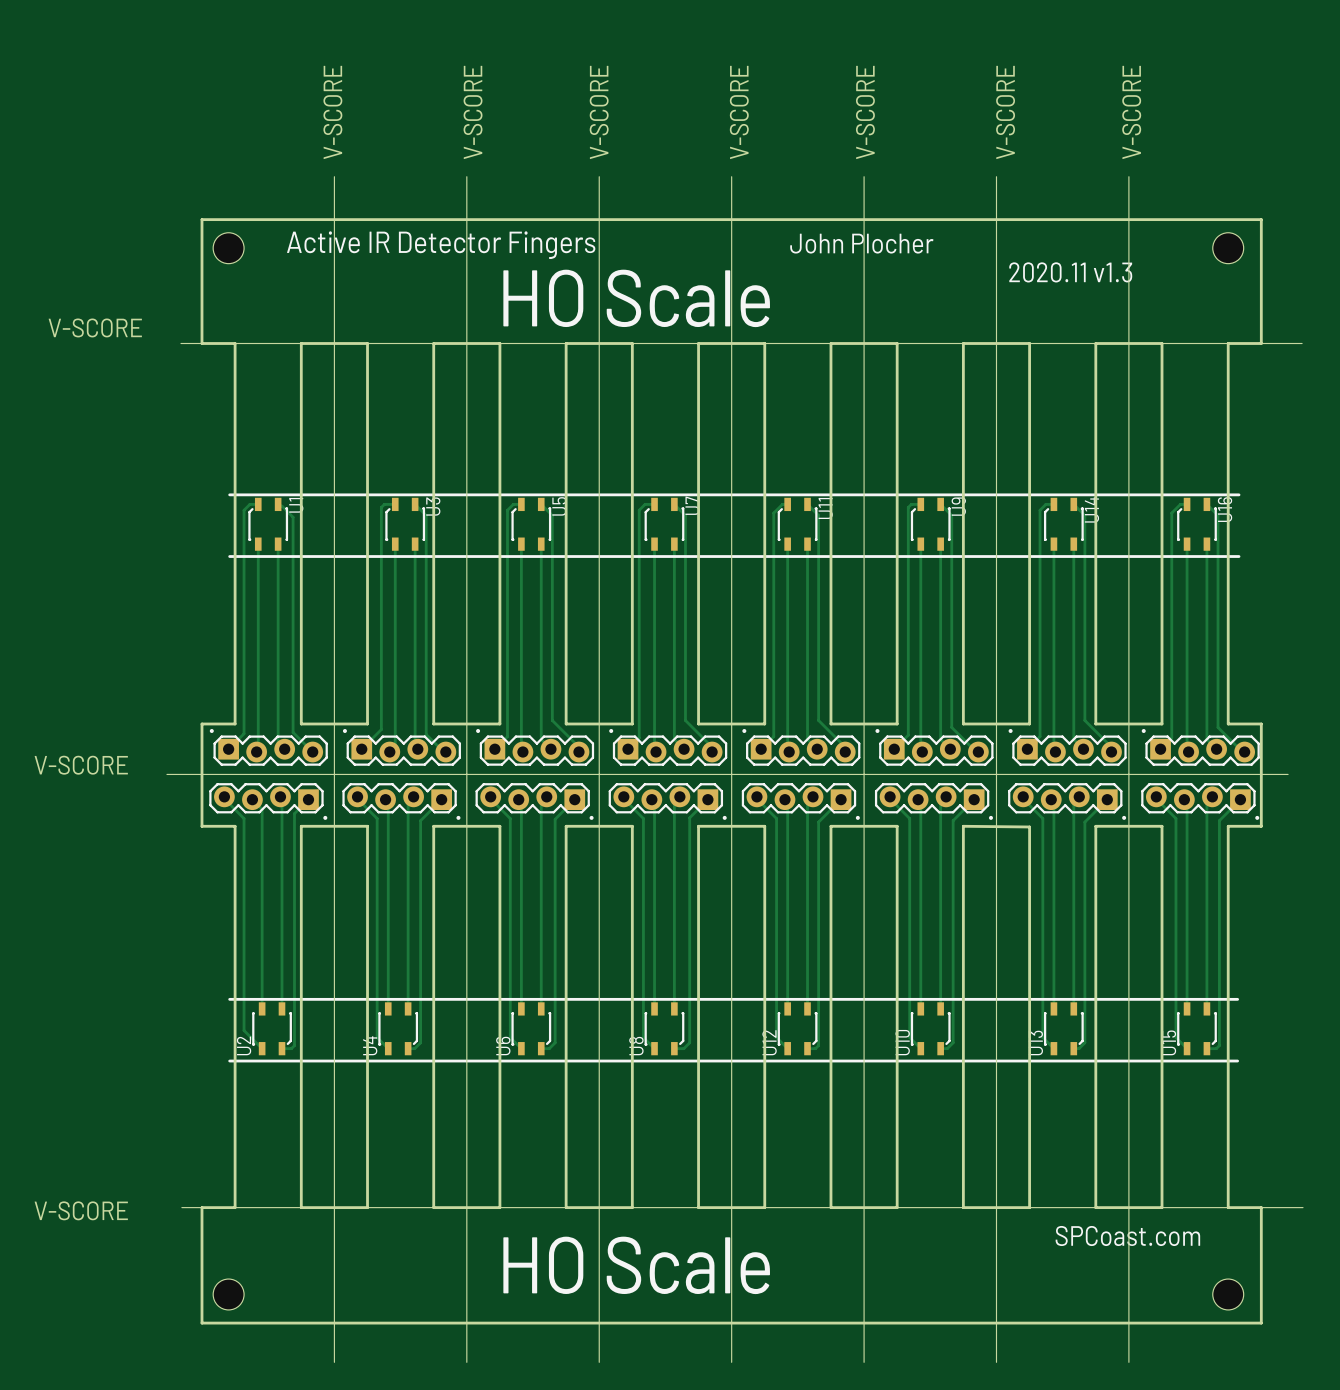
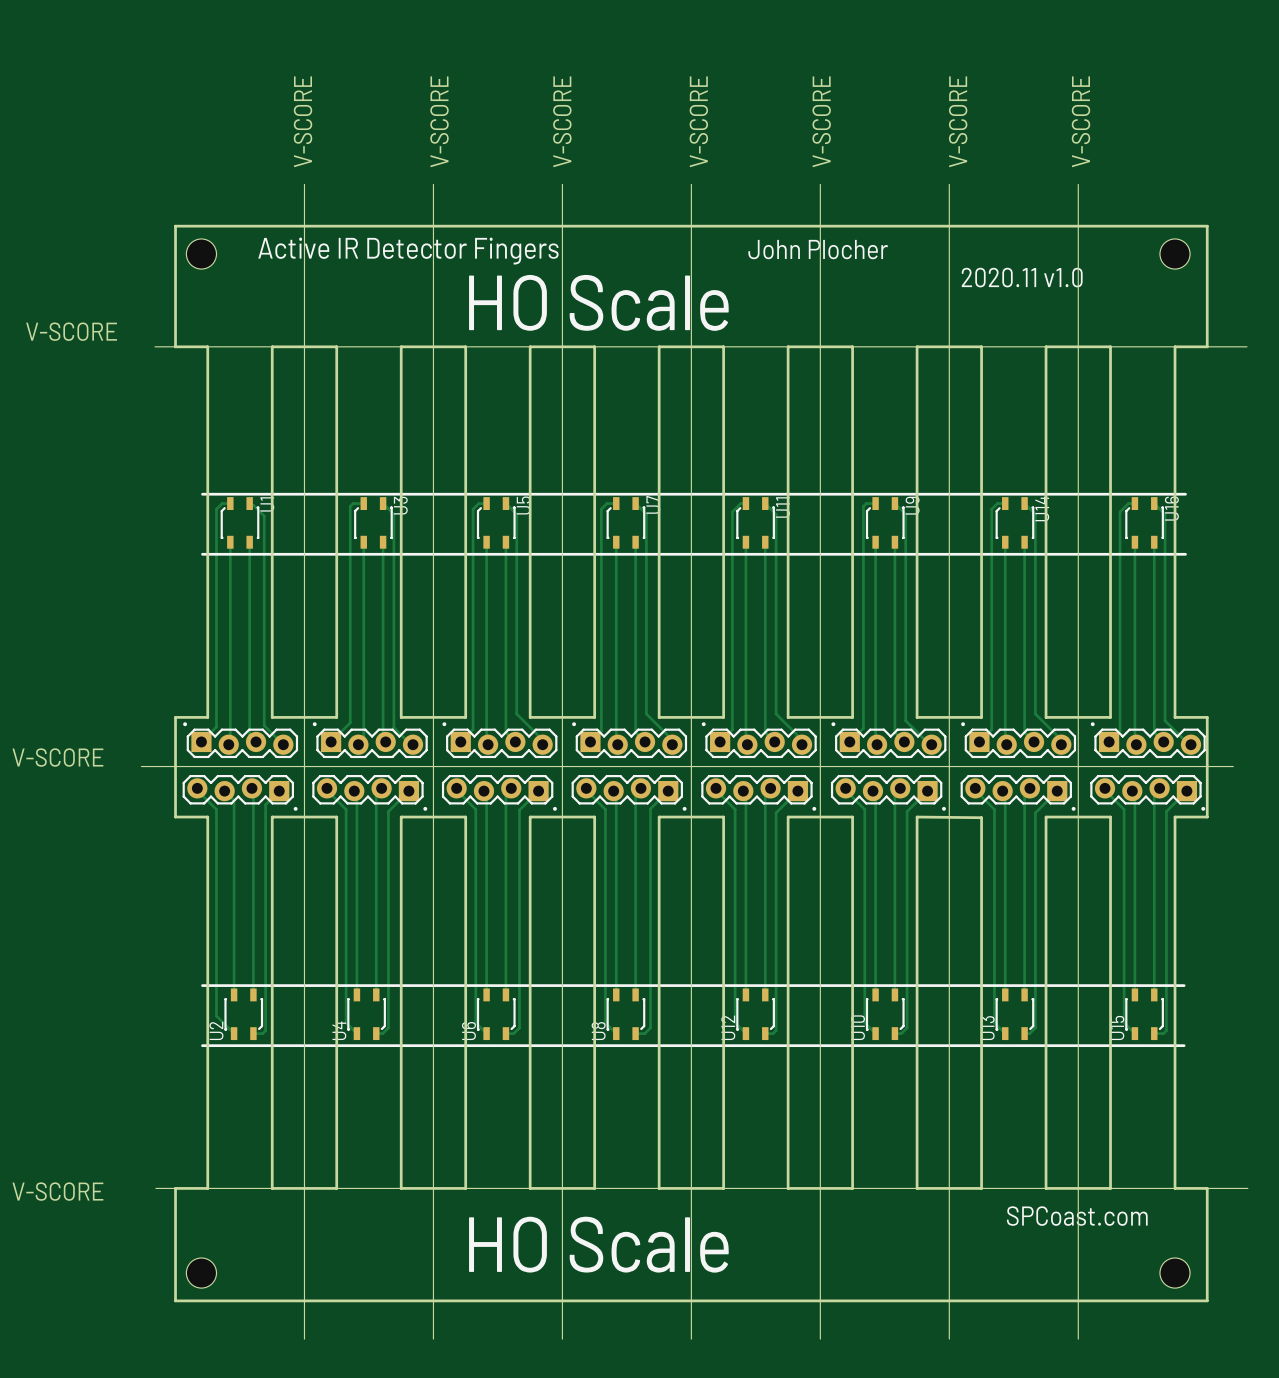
text: 2020.11 v1.3 (1070, 272) -> 2020.11 v1.0 (1022, 277)

